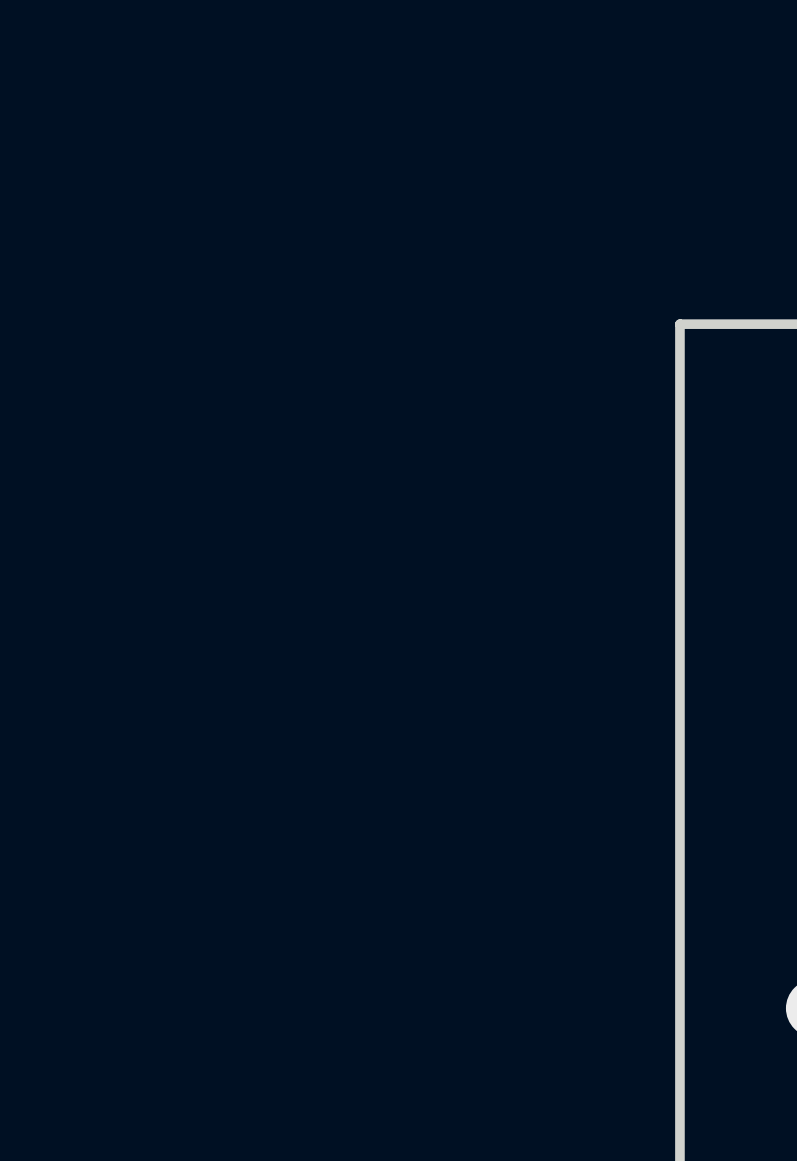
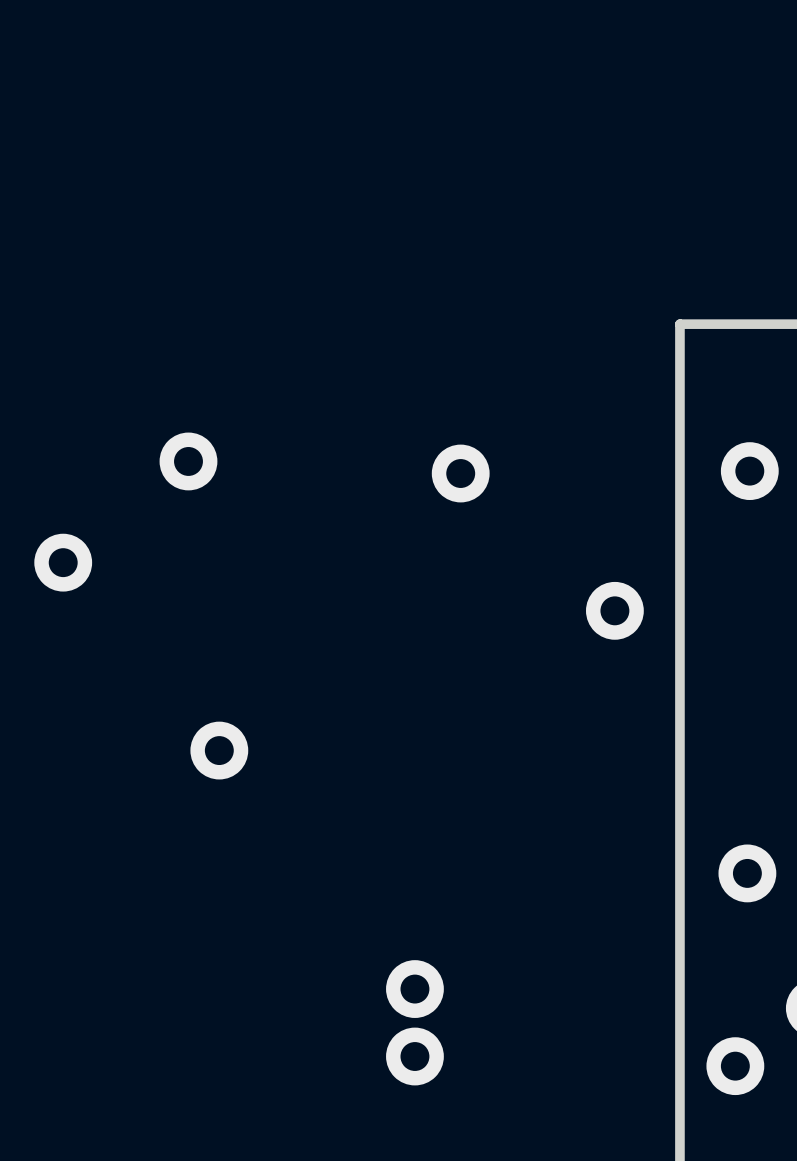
via: none -> (188, 461)
via: none -> (749, 471)
via: none -> (460, 473)
via: none -> (63, 562)
via: none -> (614, 610)
via: none -> (219, 750)
via: none -> (747, 873)
via: none -> (414, 989)
via: none -> (414, 1056)
via: none -> (735, 1066)

